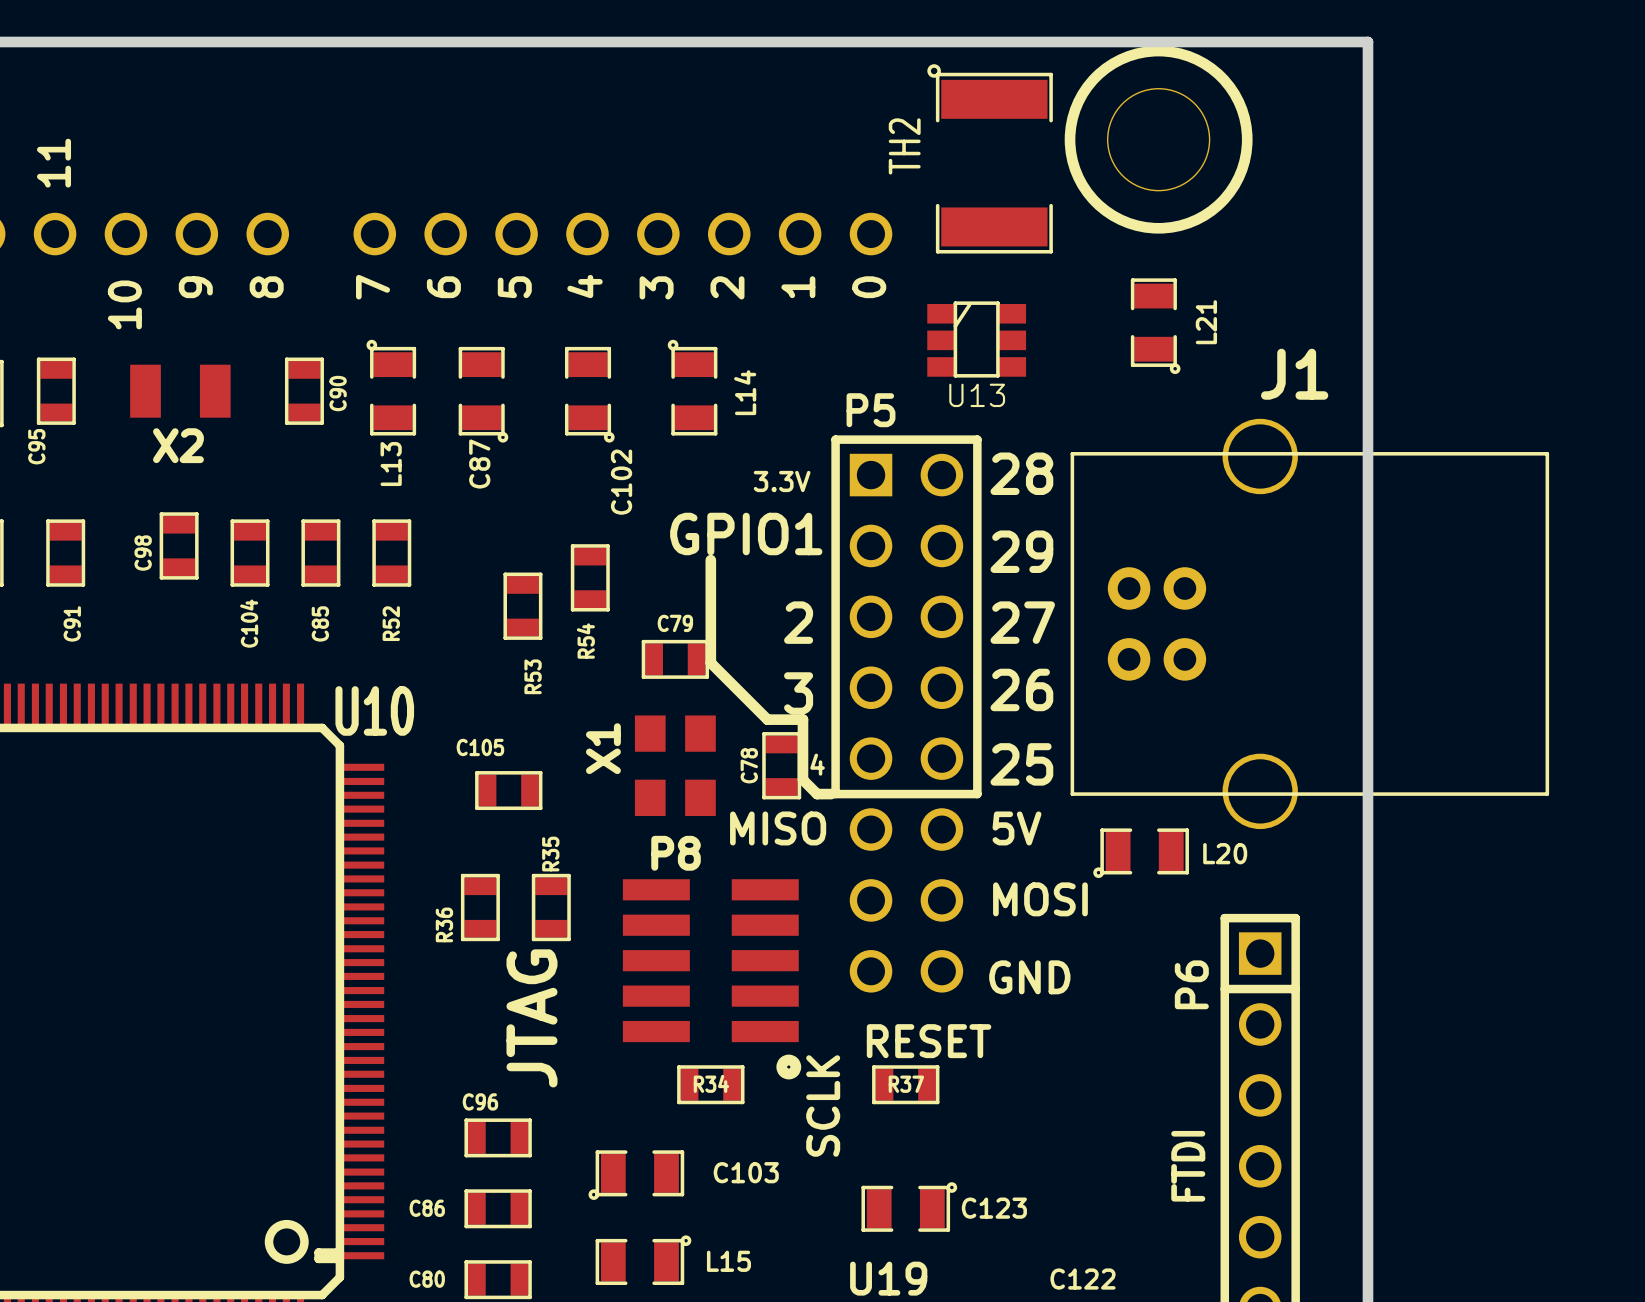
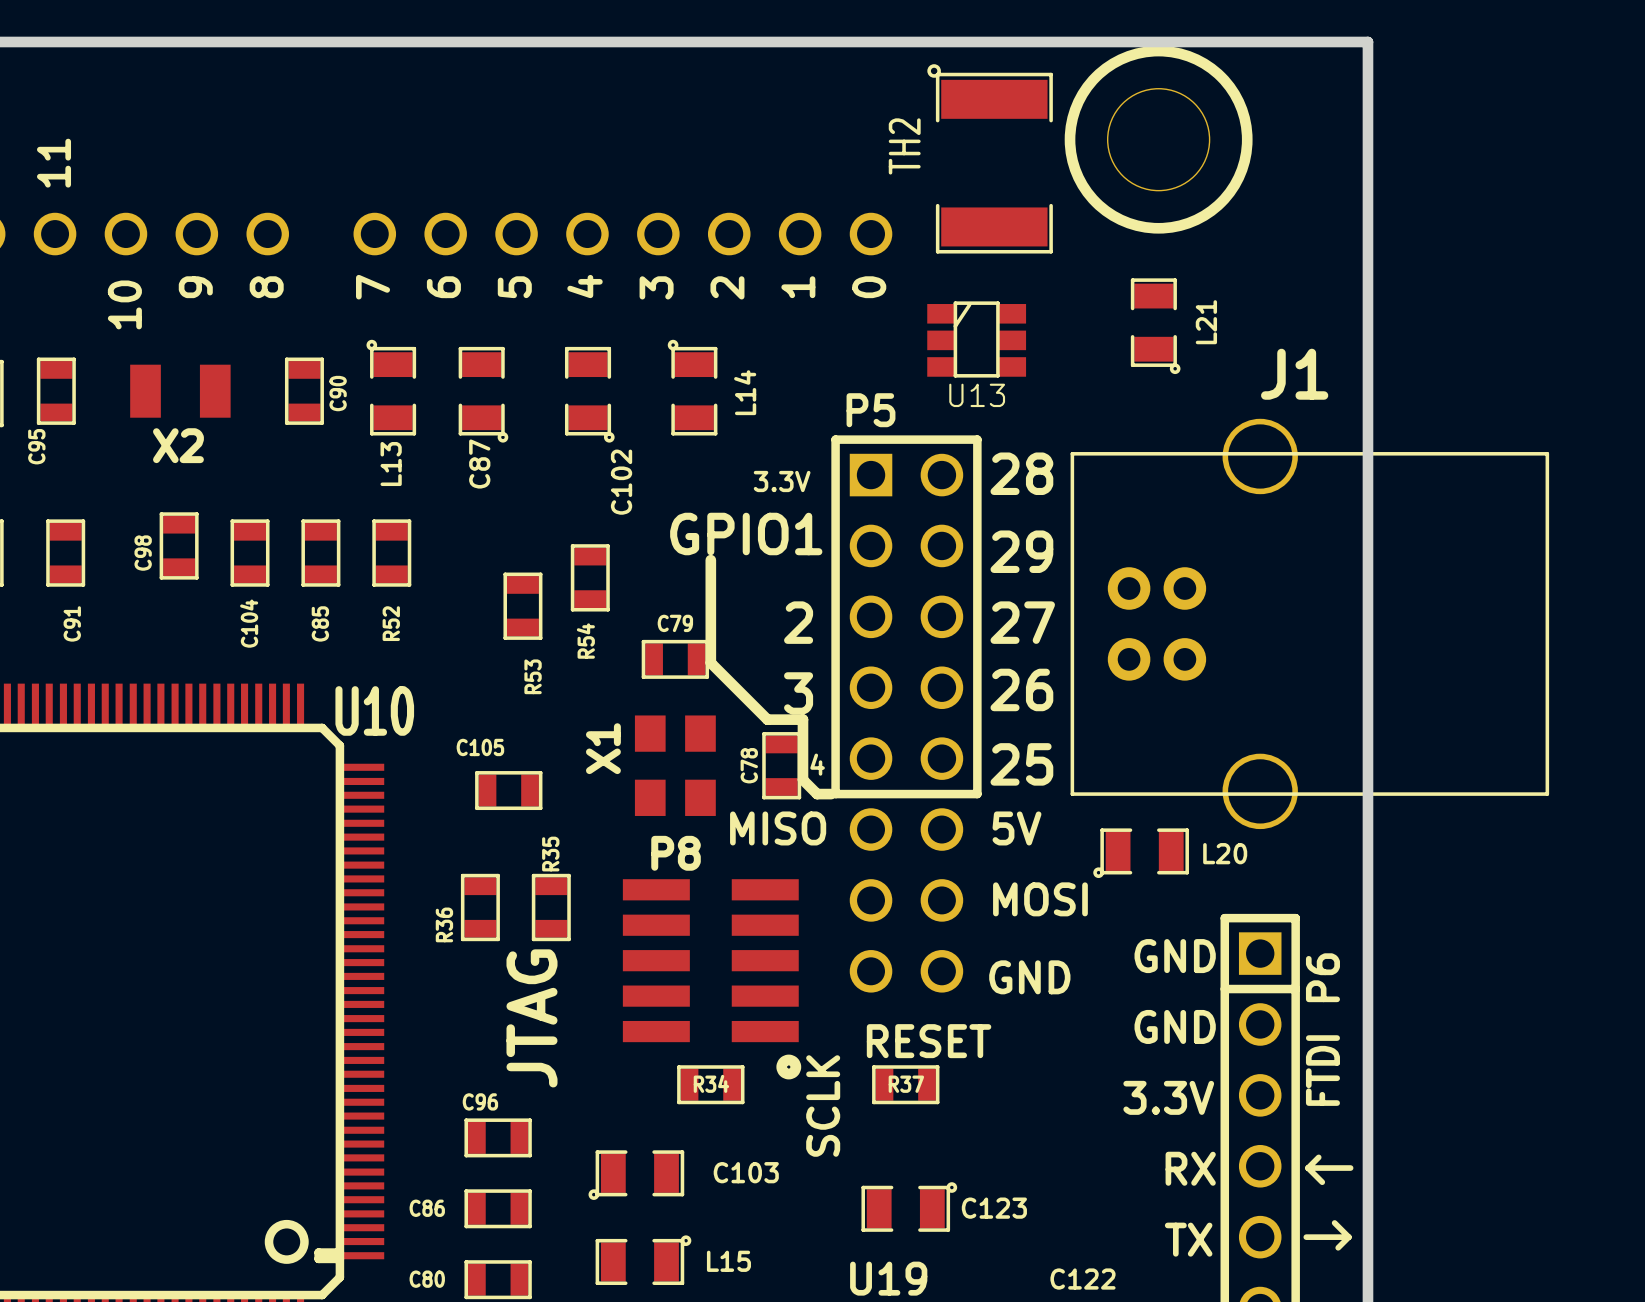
text: none -> GND (1175, 956)
P6 name position: P6 (1191, 984) -> P6 (1322, 977)
text: none -> GND (1175, 1026)
text: none -> 3.3V (1168, 1097)
line: none -> (1318, 1157) (1308, 1168)
P6 value position: FTDI (1188, 1166) -> FTDI (1322, 1070)
text: none -> RX (1190, 1168)
line: none -> (1308, 1168) (1350, 1168)
line: none -> (1308, 1168) (1322, 1182)
line: none -> (1334, 1222) (1348, 1237)
line: none -> (1306, 1237) (1348, 1237)
line: none -> (1348, 1237) (1338, 1247)
text: none -> TX (1188, 1239)

